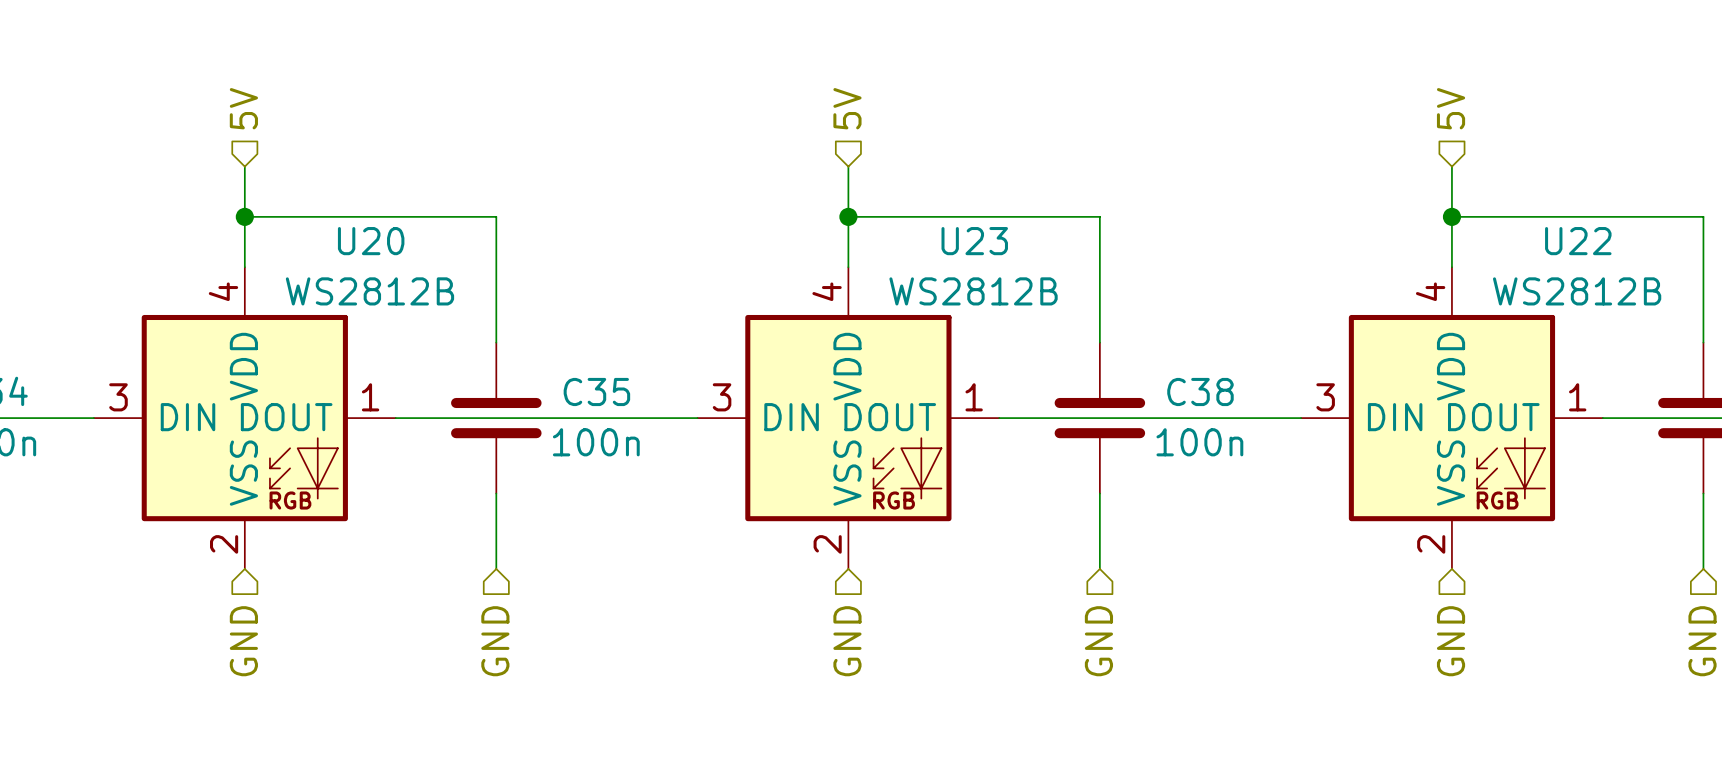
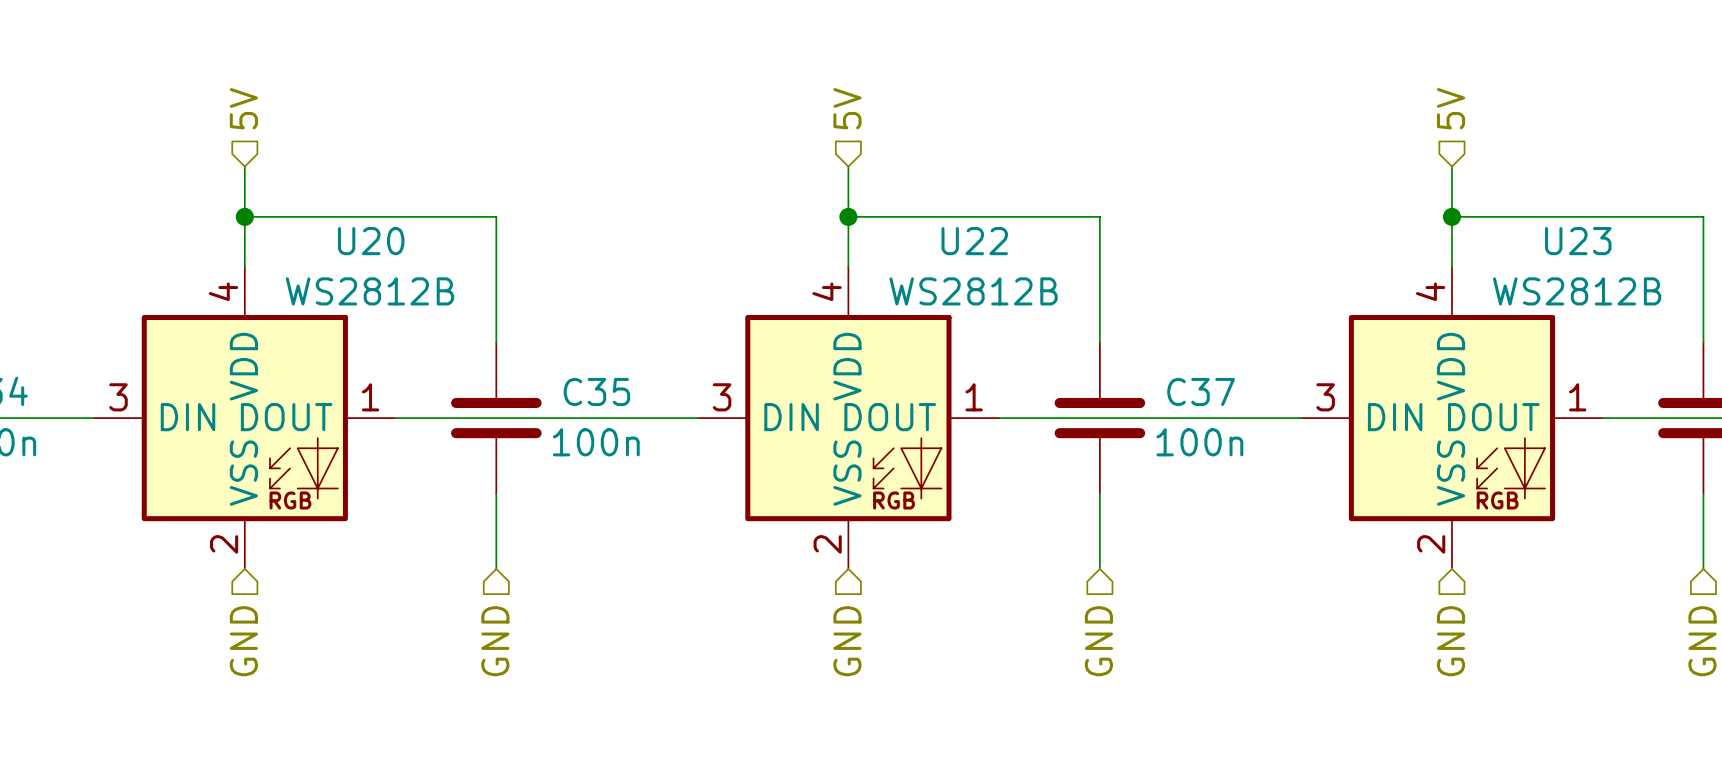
U23 name: U23 (974, 241) -> U22 (974, 241)
U22 name: U22 (1578, 241) -> U23 (1578, 241)
C38 name: C38 (1200, 391) -> C37 (1201, 391)

